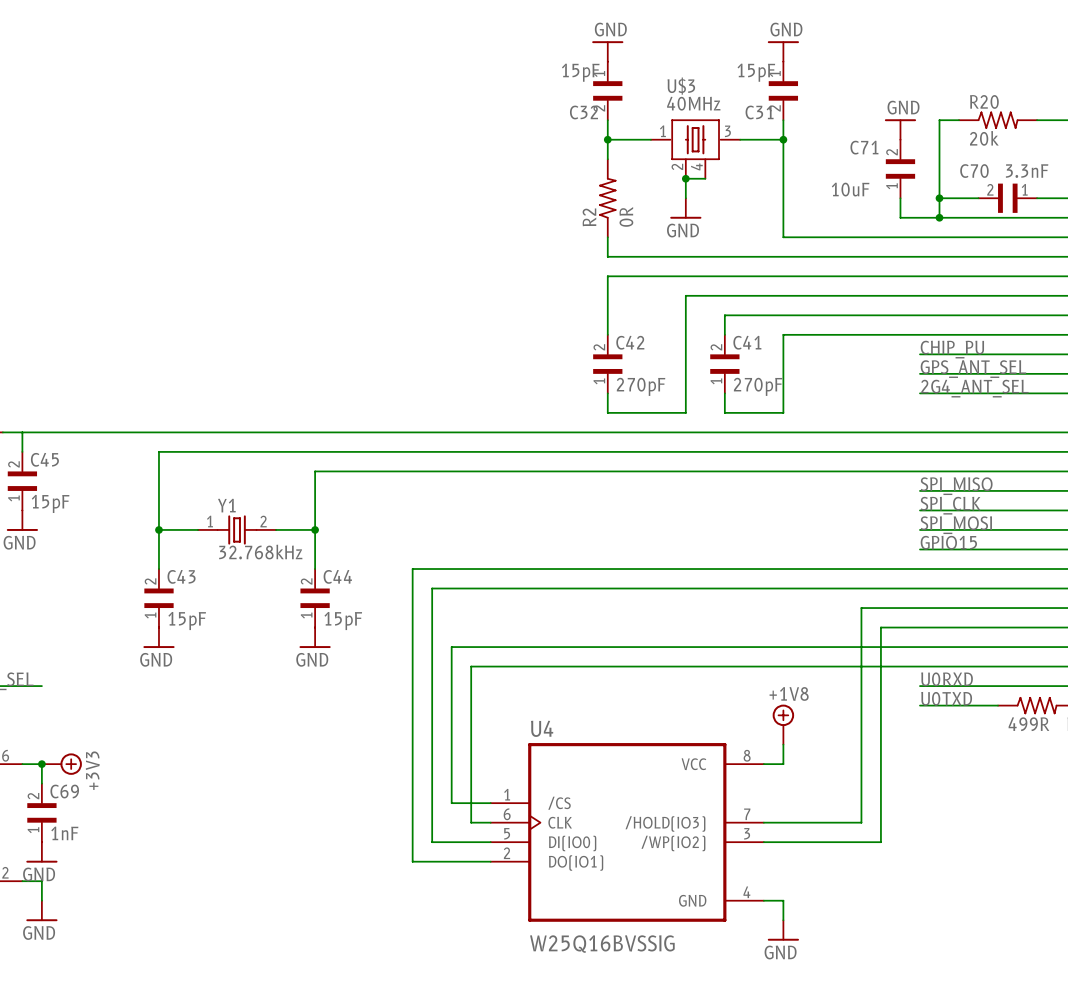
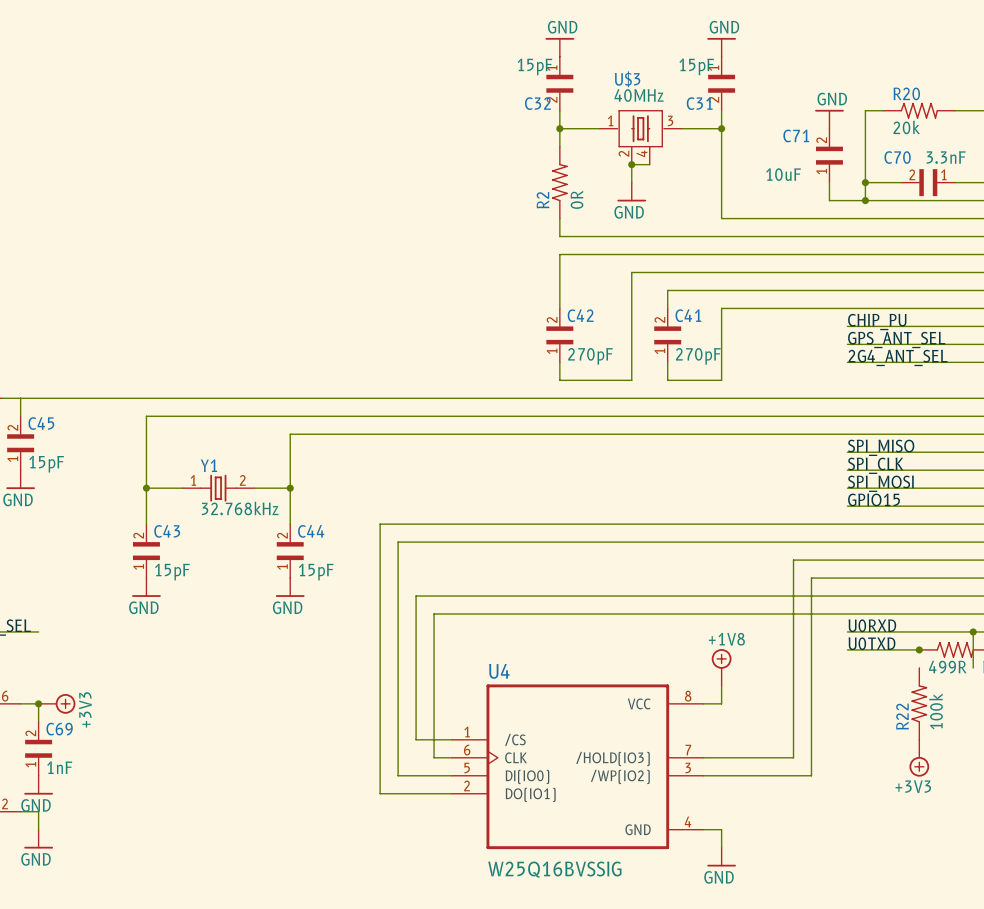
wire: none -> (973, 631) (973, 667)
junction: none -> (973, 631)
junction: none -> (919, 649)
R22: none -> 100k (919, 703)
power symbol: none -> +3V3 (919, 758)

